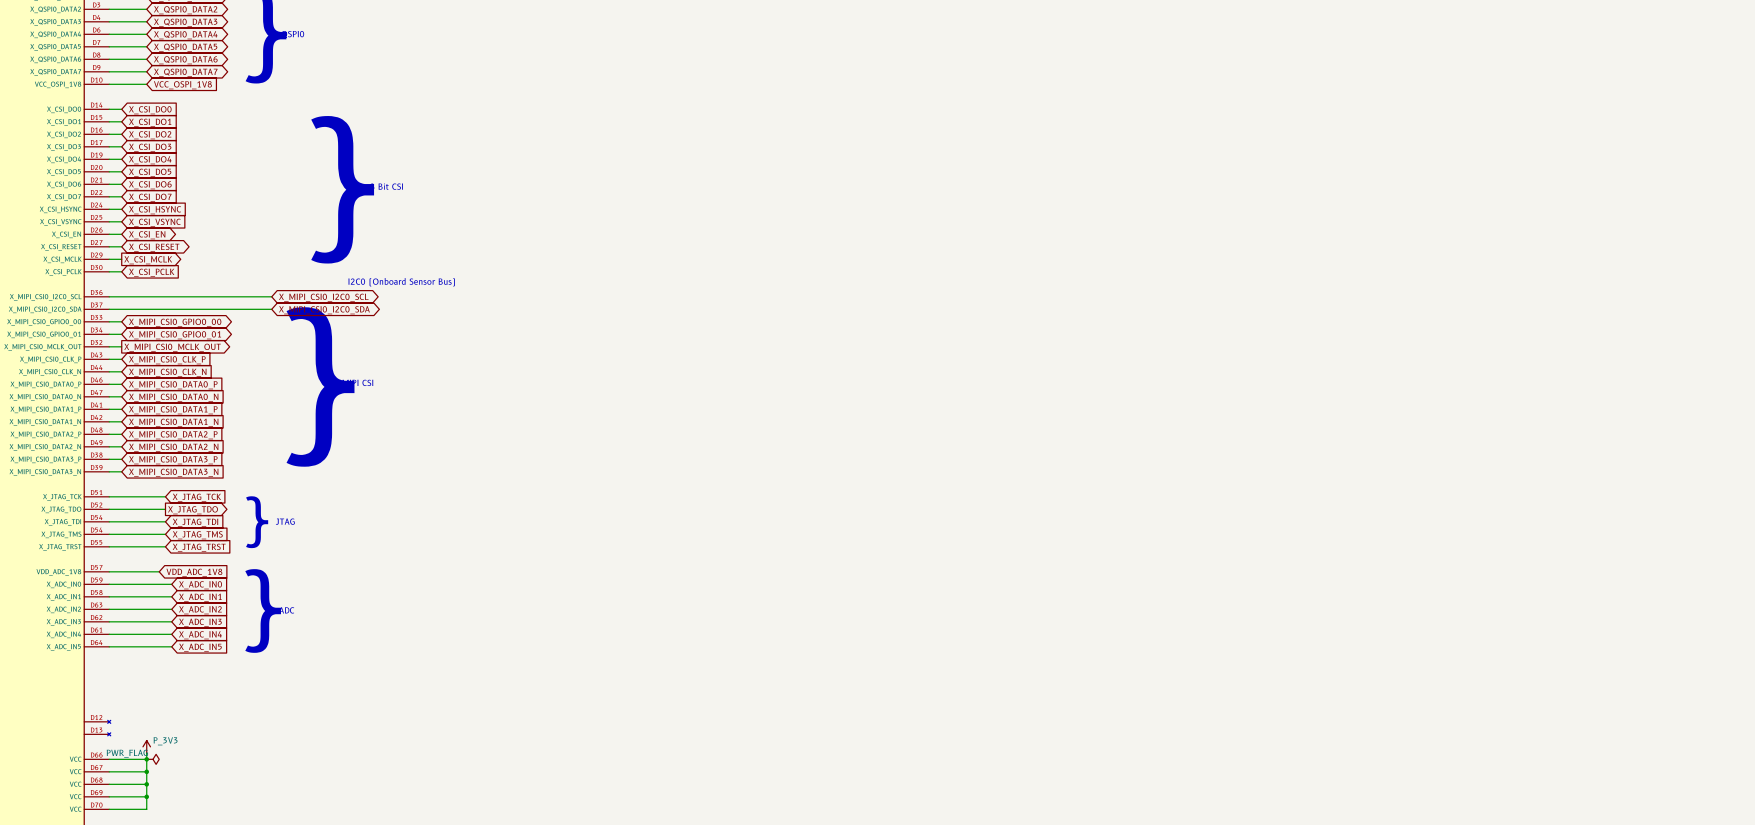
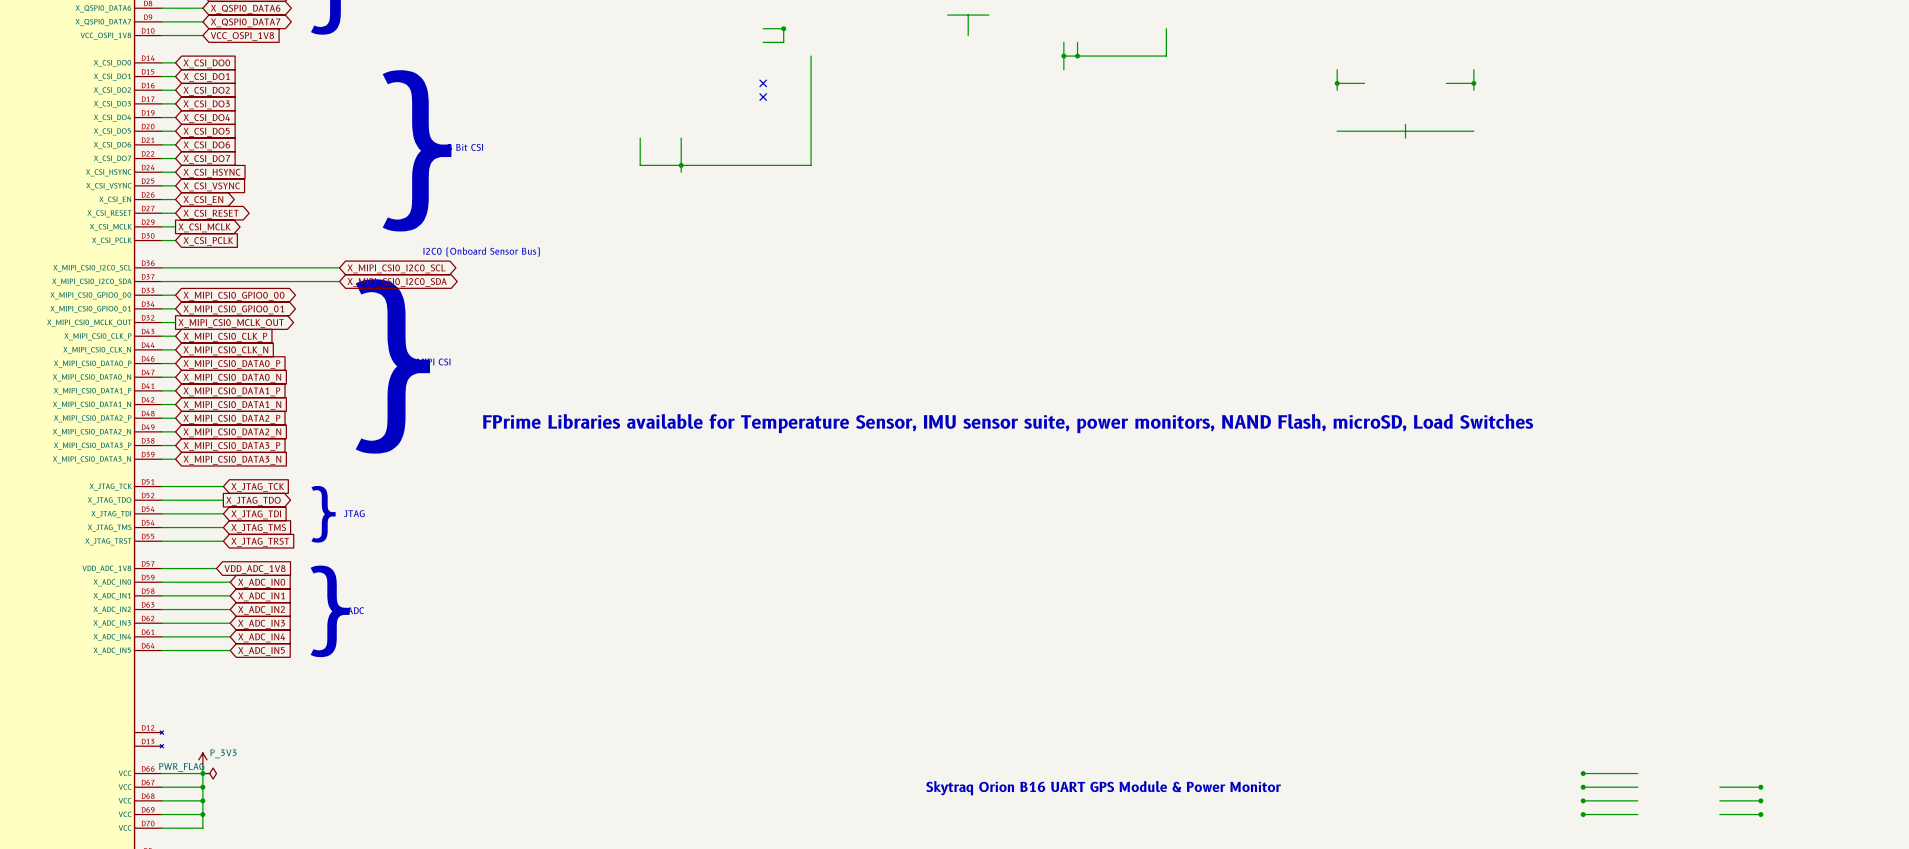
wire: none -> (947, 15) (988, 15)
wire: none -> (968, 15) (968, 35)
wire: none -> (763, 28) (783, 28) (783, 42) (763, 42)
junction: none -> (783, 28)
wire: none -> (1166, 28) (1166, 56) (1063, 56)
wire: none -> (1063, 42) (1063, 69)
wire: none -> (1077, 42) (1077, 56)
wire: none -> (811, 56) (811, 165) (640, 165) (640, 138)
junction: none -> (1063, 56)
junction: none -> (1077, 56)
wire: none -> (1337, 69) (1337, 90)
wire: none -> (1473, 69) (1473, 90)
no-connect mark: none -> (763, 83)
wire: none -> (1337, 83) (1364, 83)
junction: none -> (1337, 83)
wire: none -> (1446, 83) (1473, 83)
junction: none -> (1473, 83)
no-connect mark: none -> (763, 97)
wire: none -> (1405, 124) (1405, 138)
wire: none -> (1337, 131) (1473, 131)
wire: none -> (681, 138) (681, 172)
junction: none -> (681, 165)
text: none -> FPrime Libraries available for Temperature Sensor, IMU sensor suite, power monitors, NAND Flash, microSD, Load Switches (1008, 423)
wire: none -> (1583, 773) (1637, 773)
junction: none -> (1583, 773)
wire: none -> (1583, 787) (1637, 787)
junction: none -> (1583, 787)
wire: none -> (1719, 787) (1760, 787)
junction: none -> (1760, 787)
text: none -> Skytraq Orion B16 UART GPS Module & Power Monitor (1103, 788)
wire: none -> (1583, 800) (1637, 800)
junction: none -> (1583, 800)
wire: none -> (1719, 800) (1760, 800)
junction: none -> (1760, 800)
wire: none -> (1583, 814) (1637, 814)
junction: none -> (1583, 814)
wire: none -> (1719, 814) (1760, 814)
junction: none -> (1760, 814)

